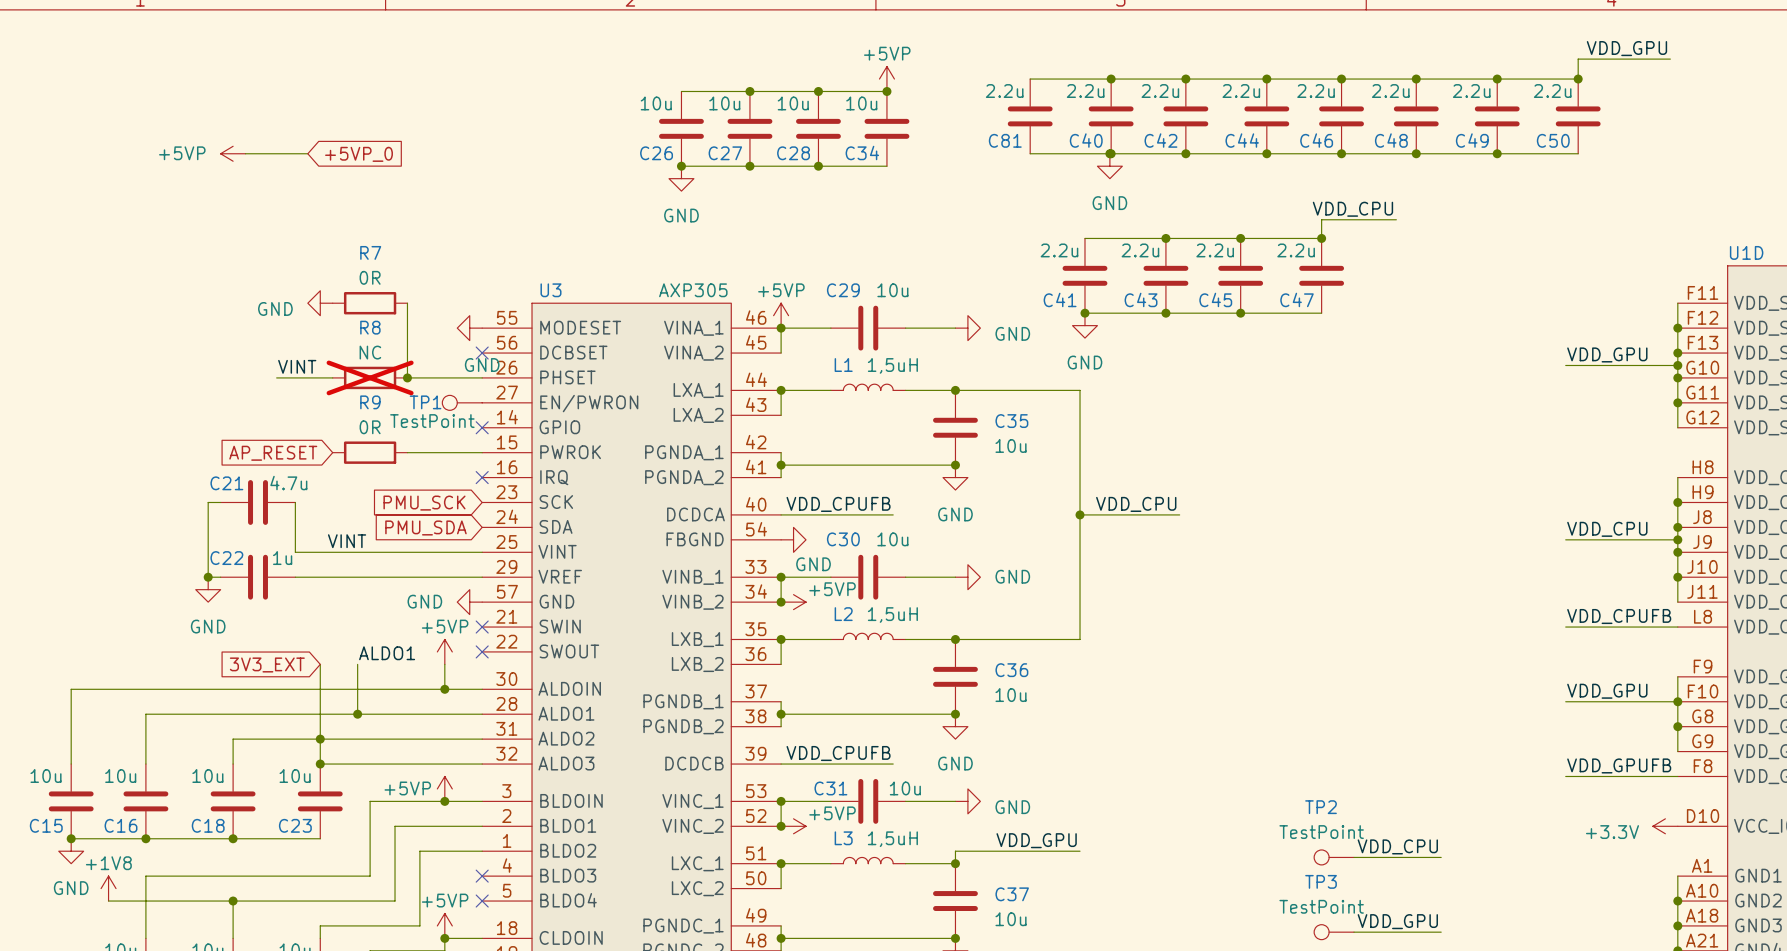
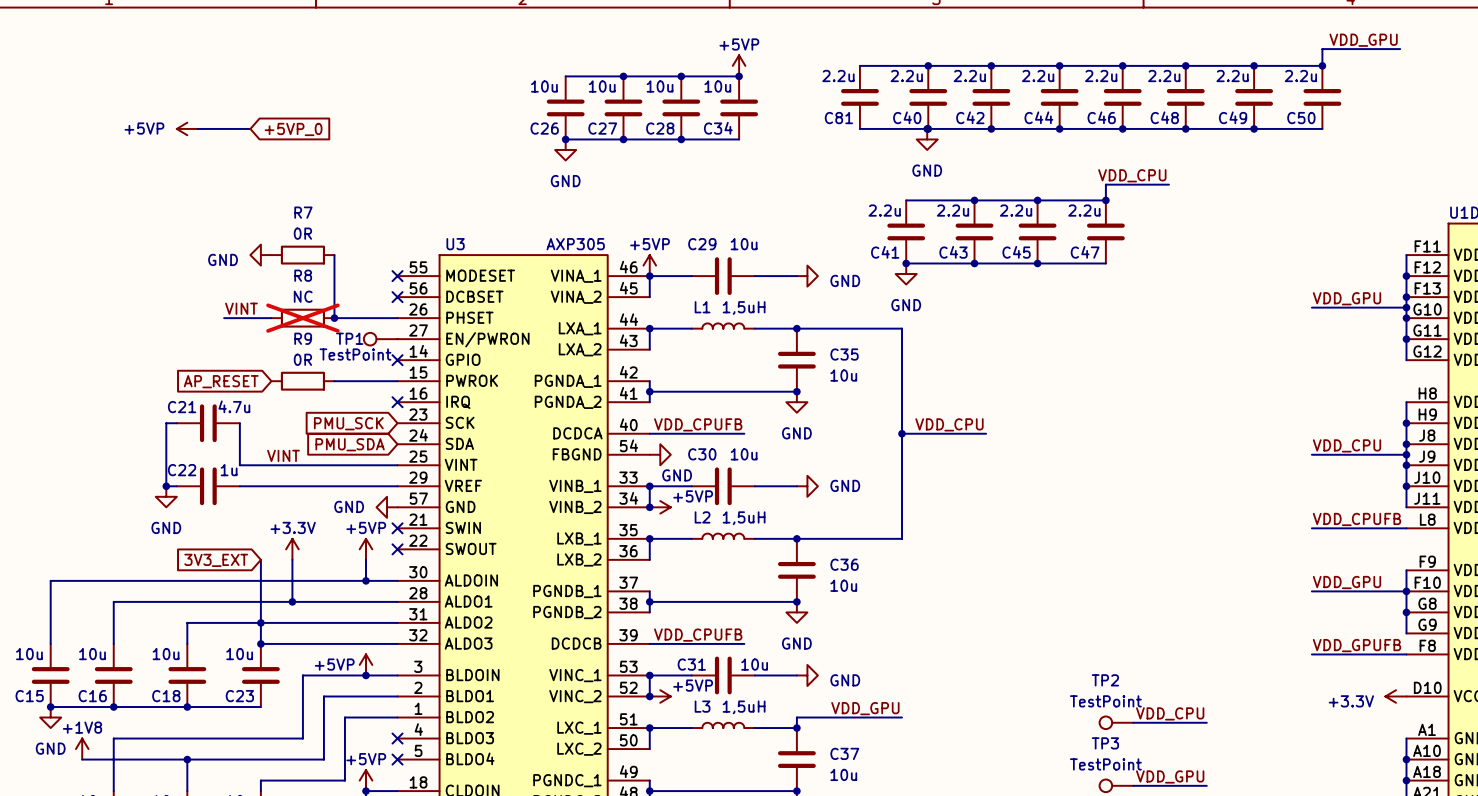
power symbol: GND (469, 328) -> none
no-connect mark: none -> (397, 276)
power symbol: none -> +3.3V (292, 549)
label: ALDO1 (387, 653) -> none

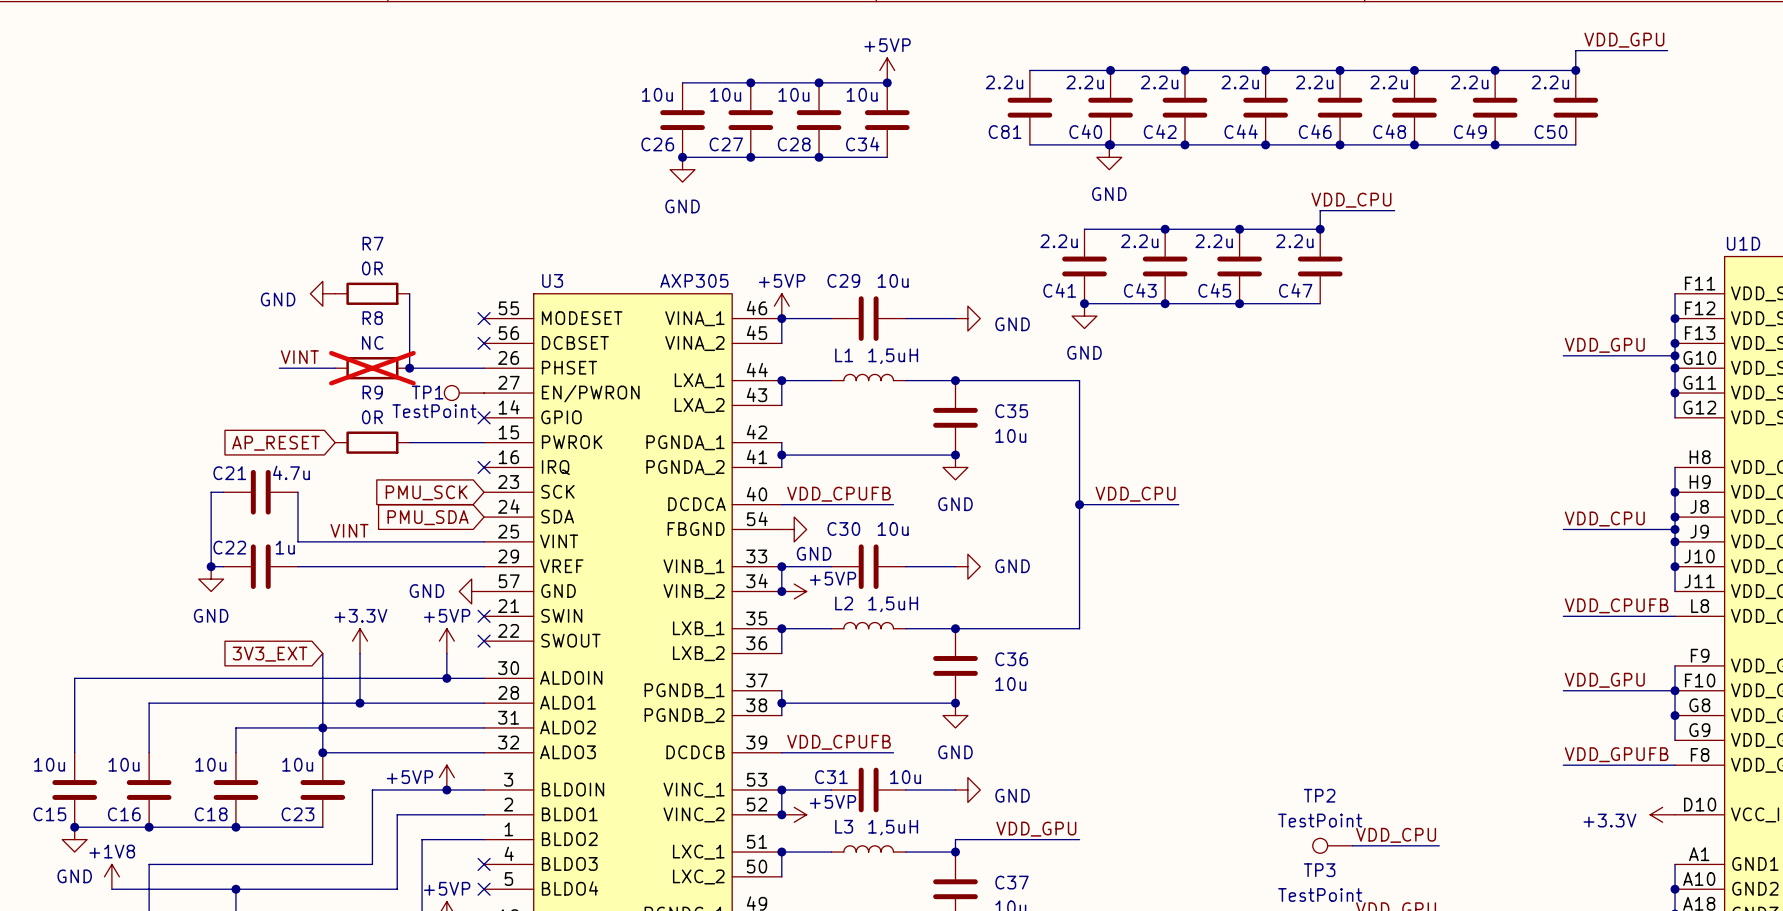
power symbol: +5VP (187, 128) -> none
wire: (197, 128) (250, 128) -> none
global label: +5VP_0 (293, 129) -> none

